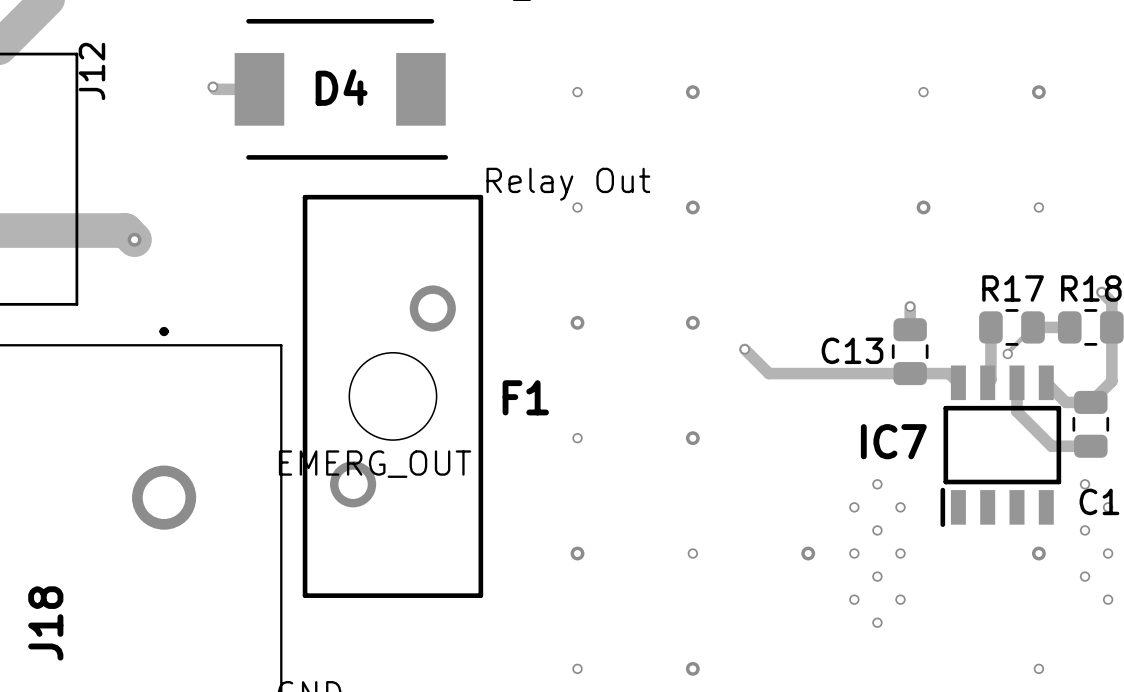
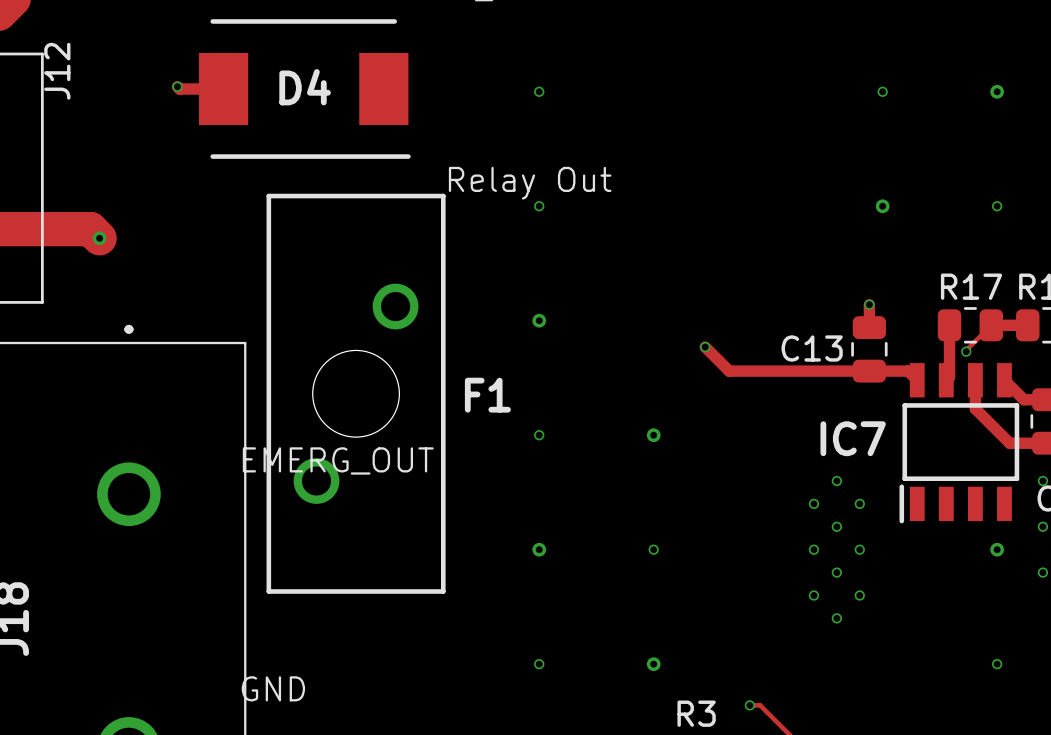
via: (692, 92) -> none
via: (692, 207) -> none
via: (692, 322) -> none
via: (808, 553) -> none

